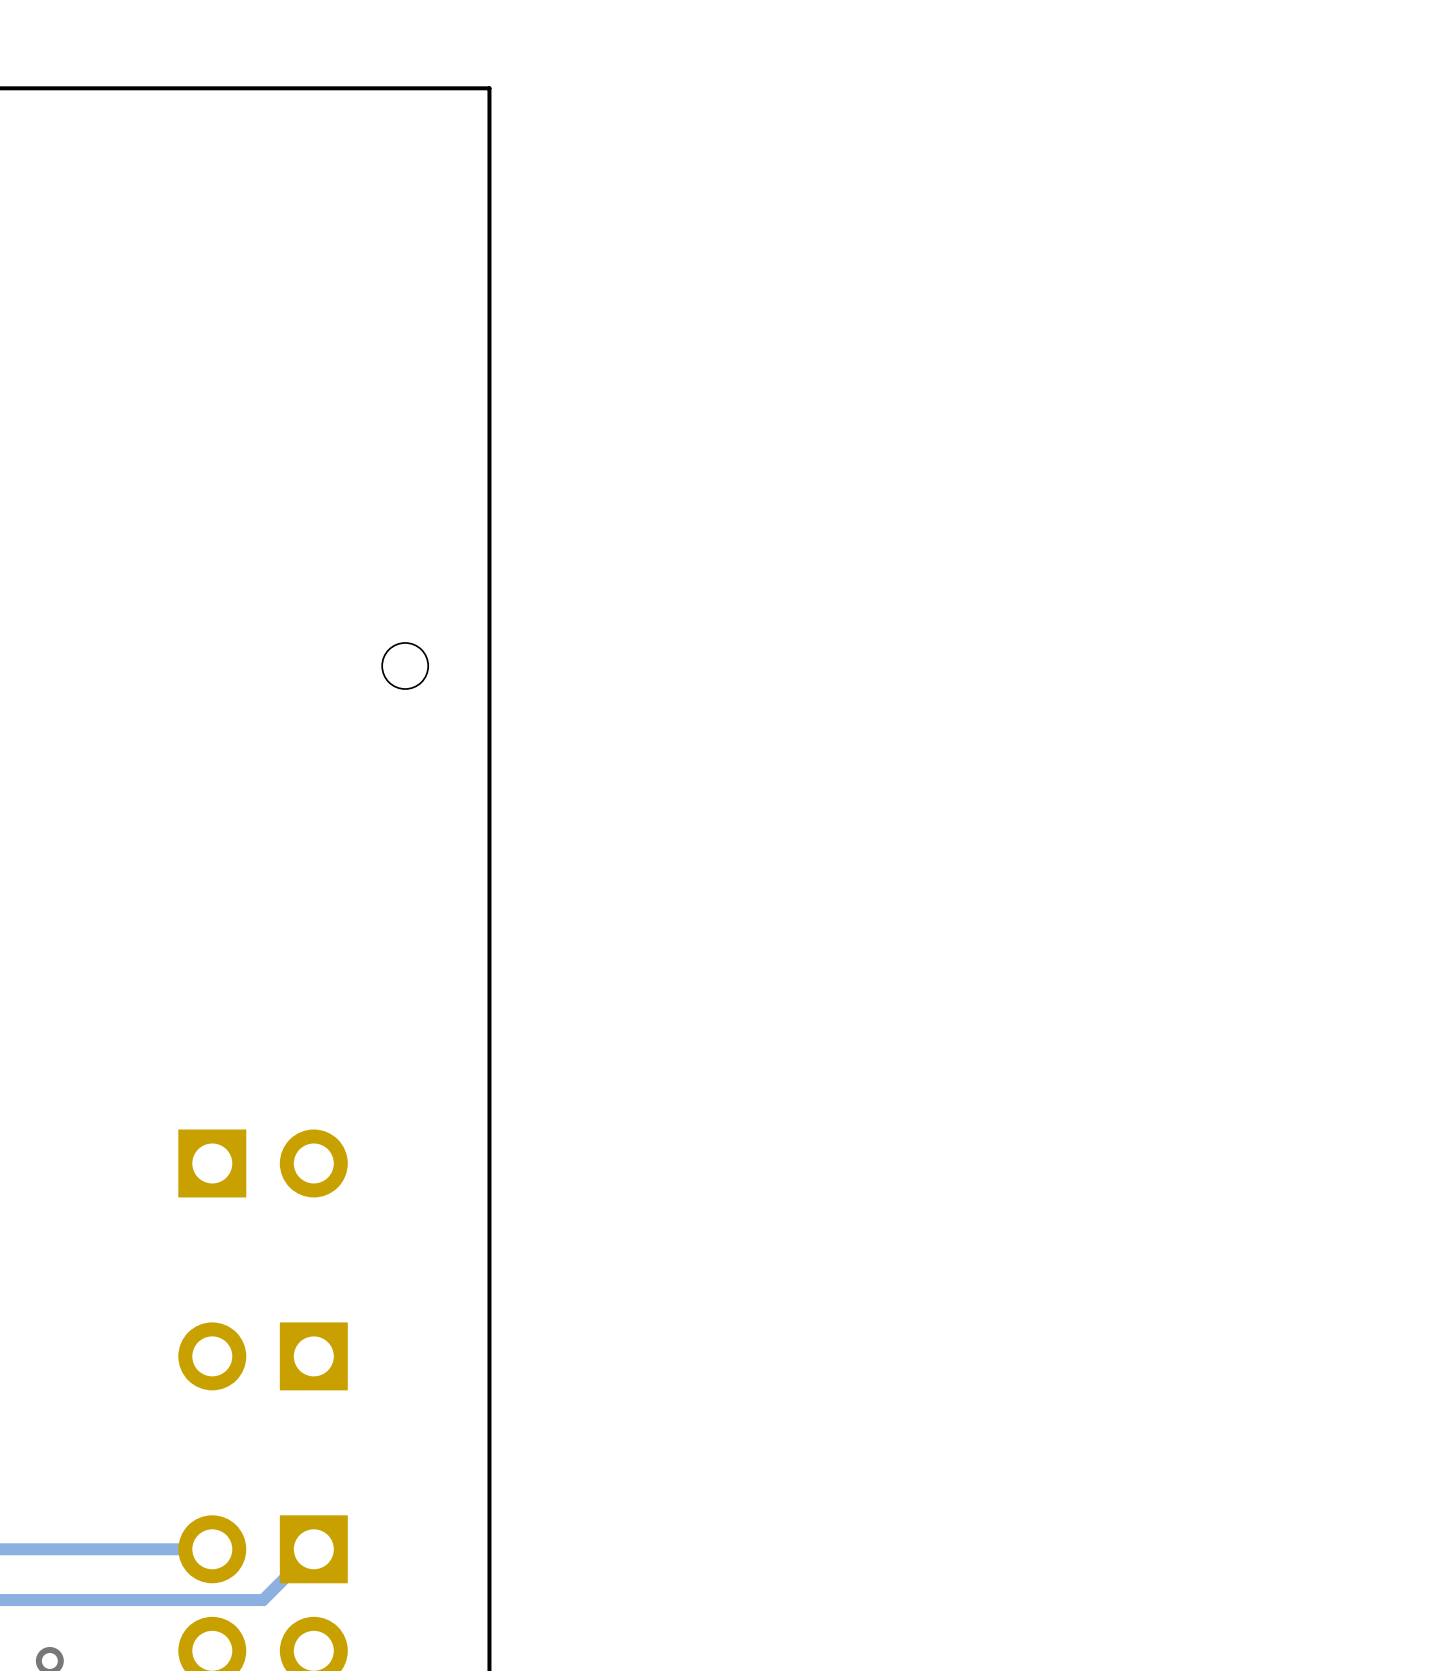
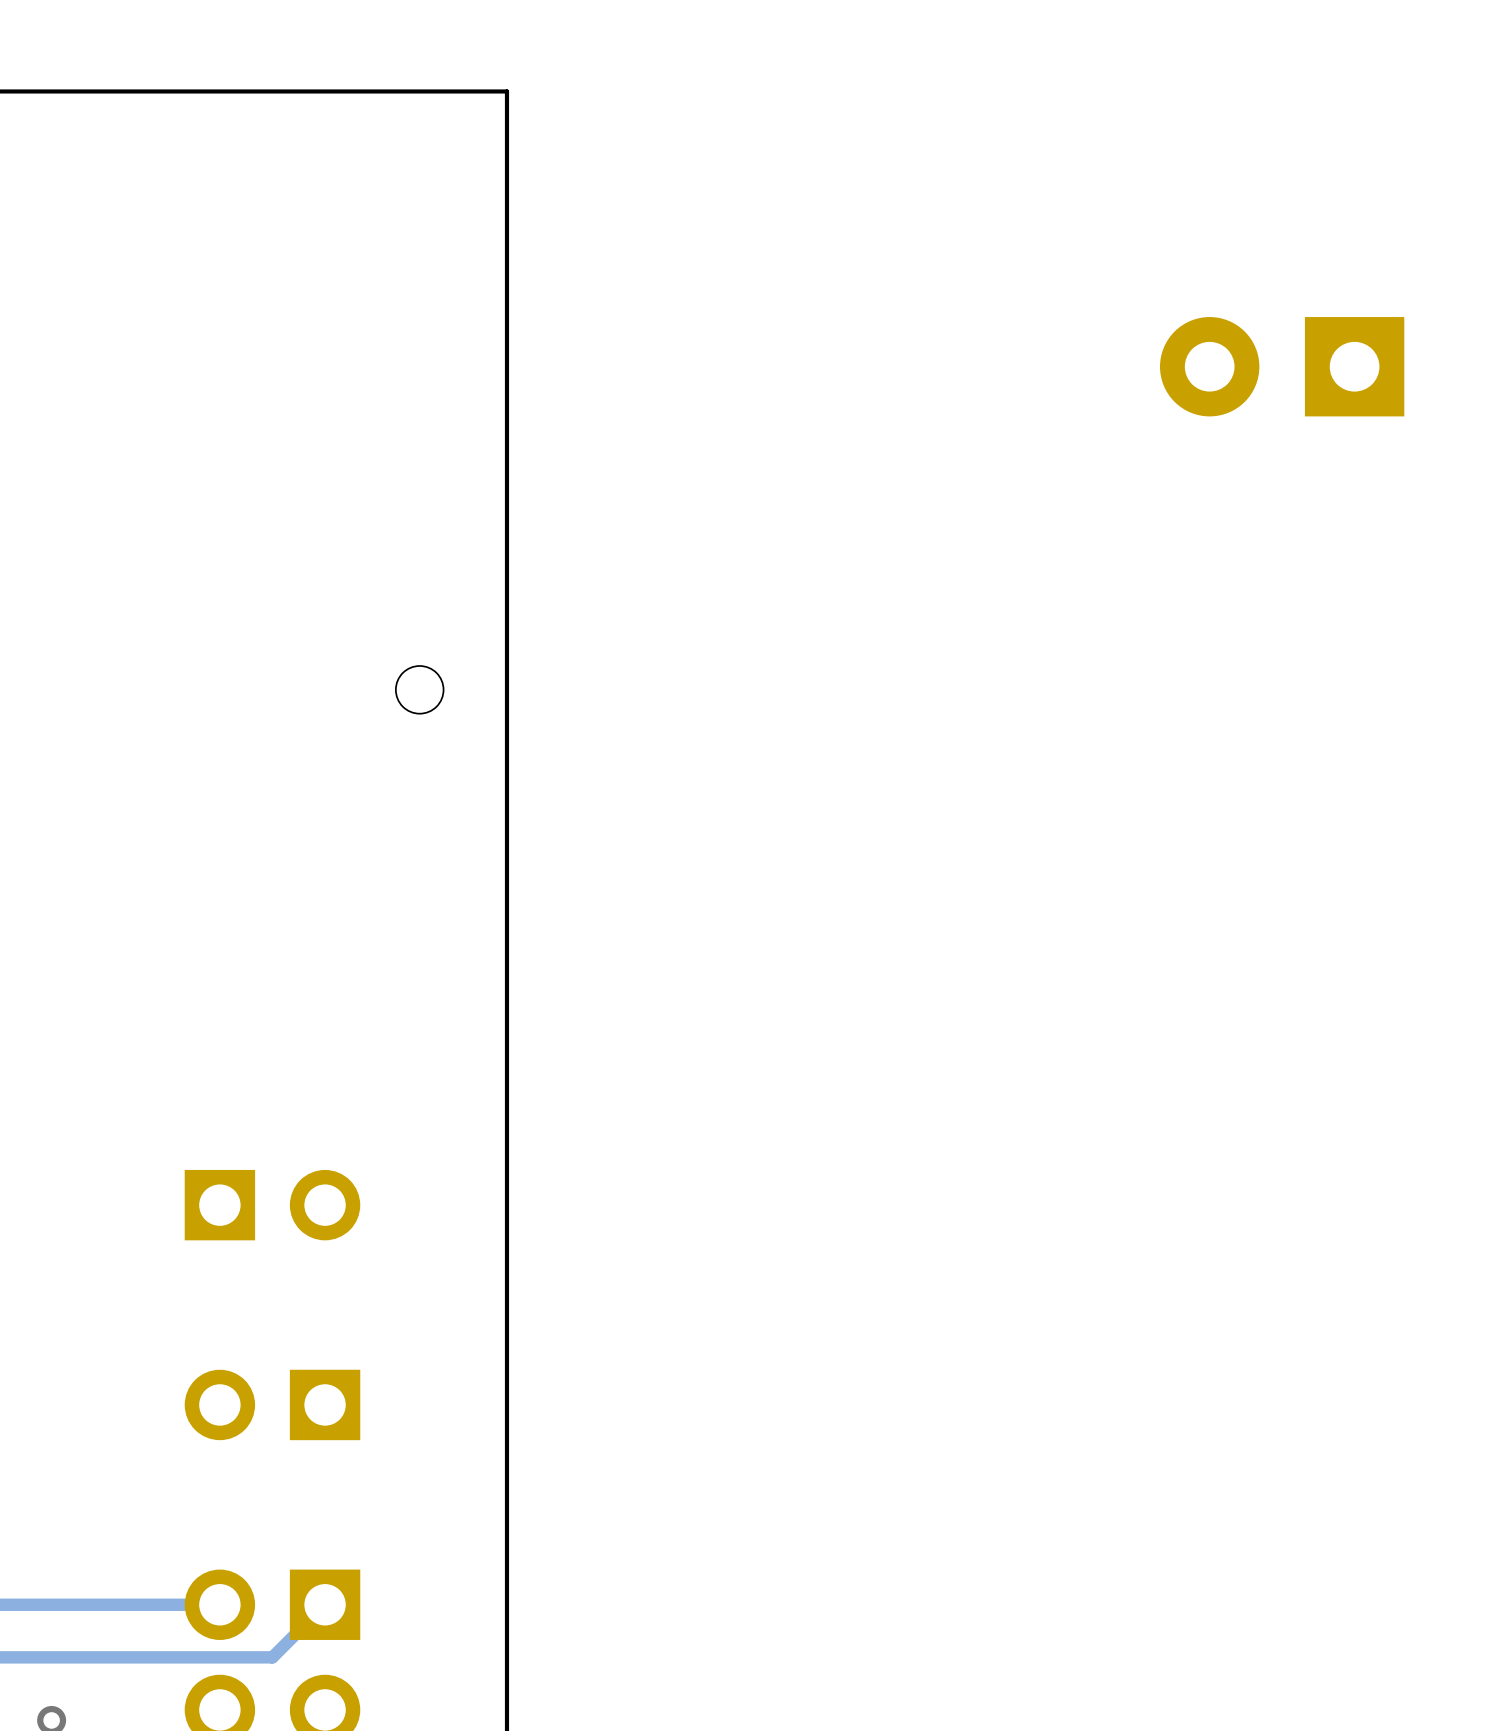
part: none -> (1282, 366)

